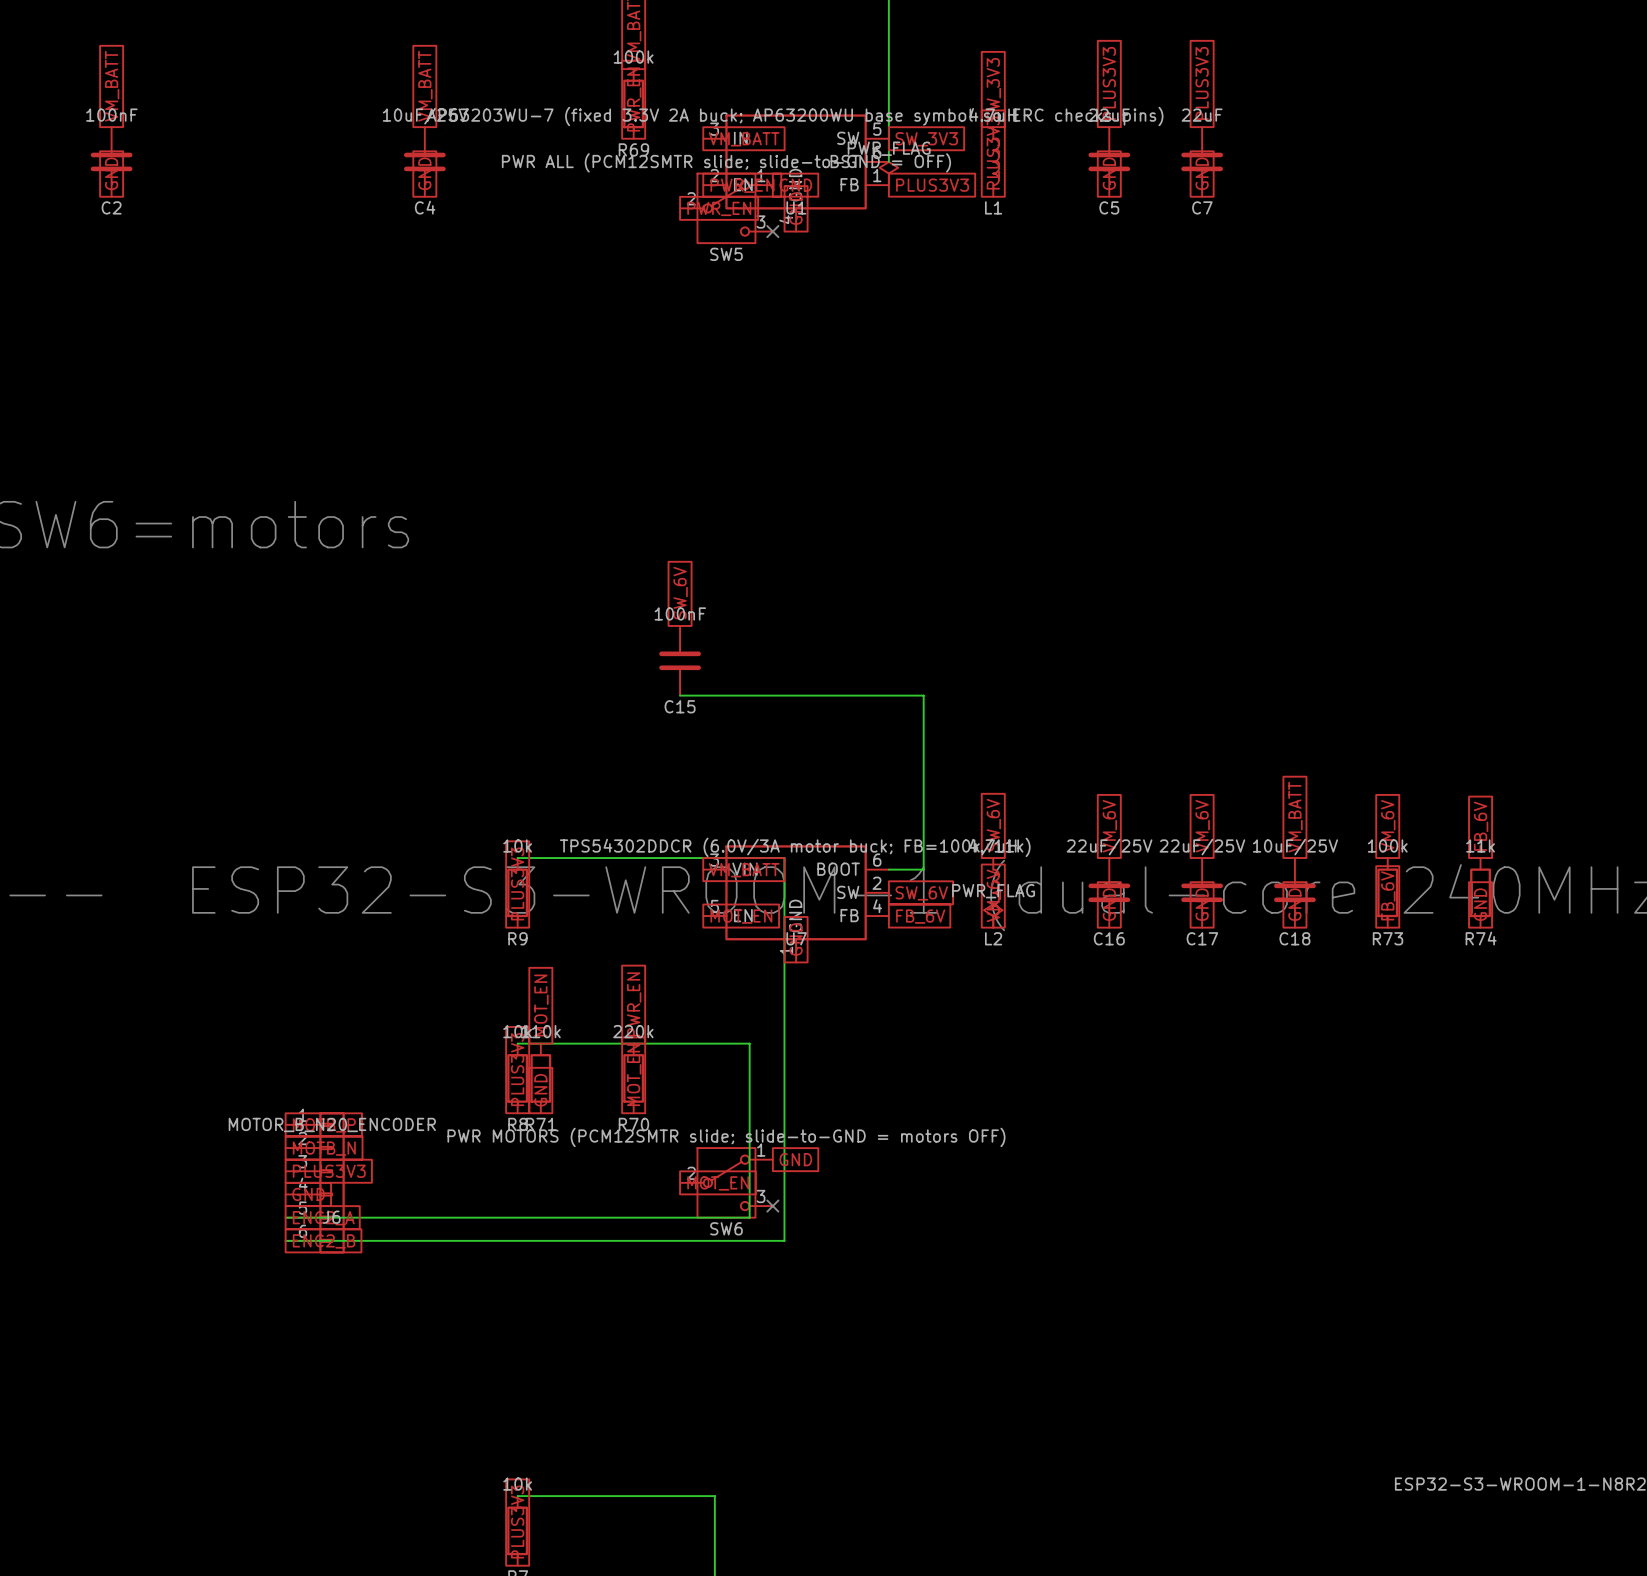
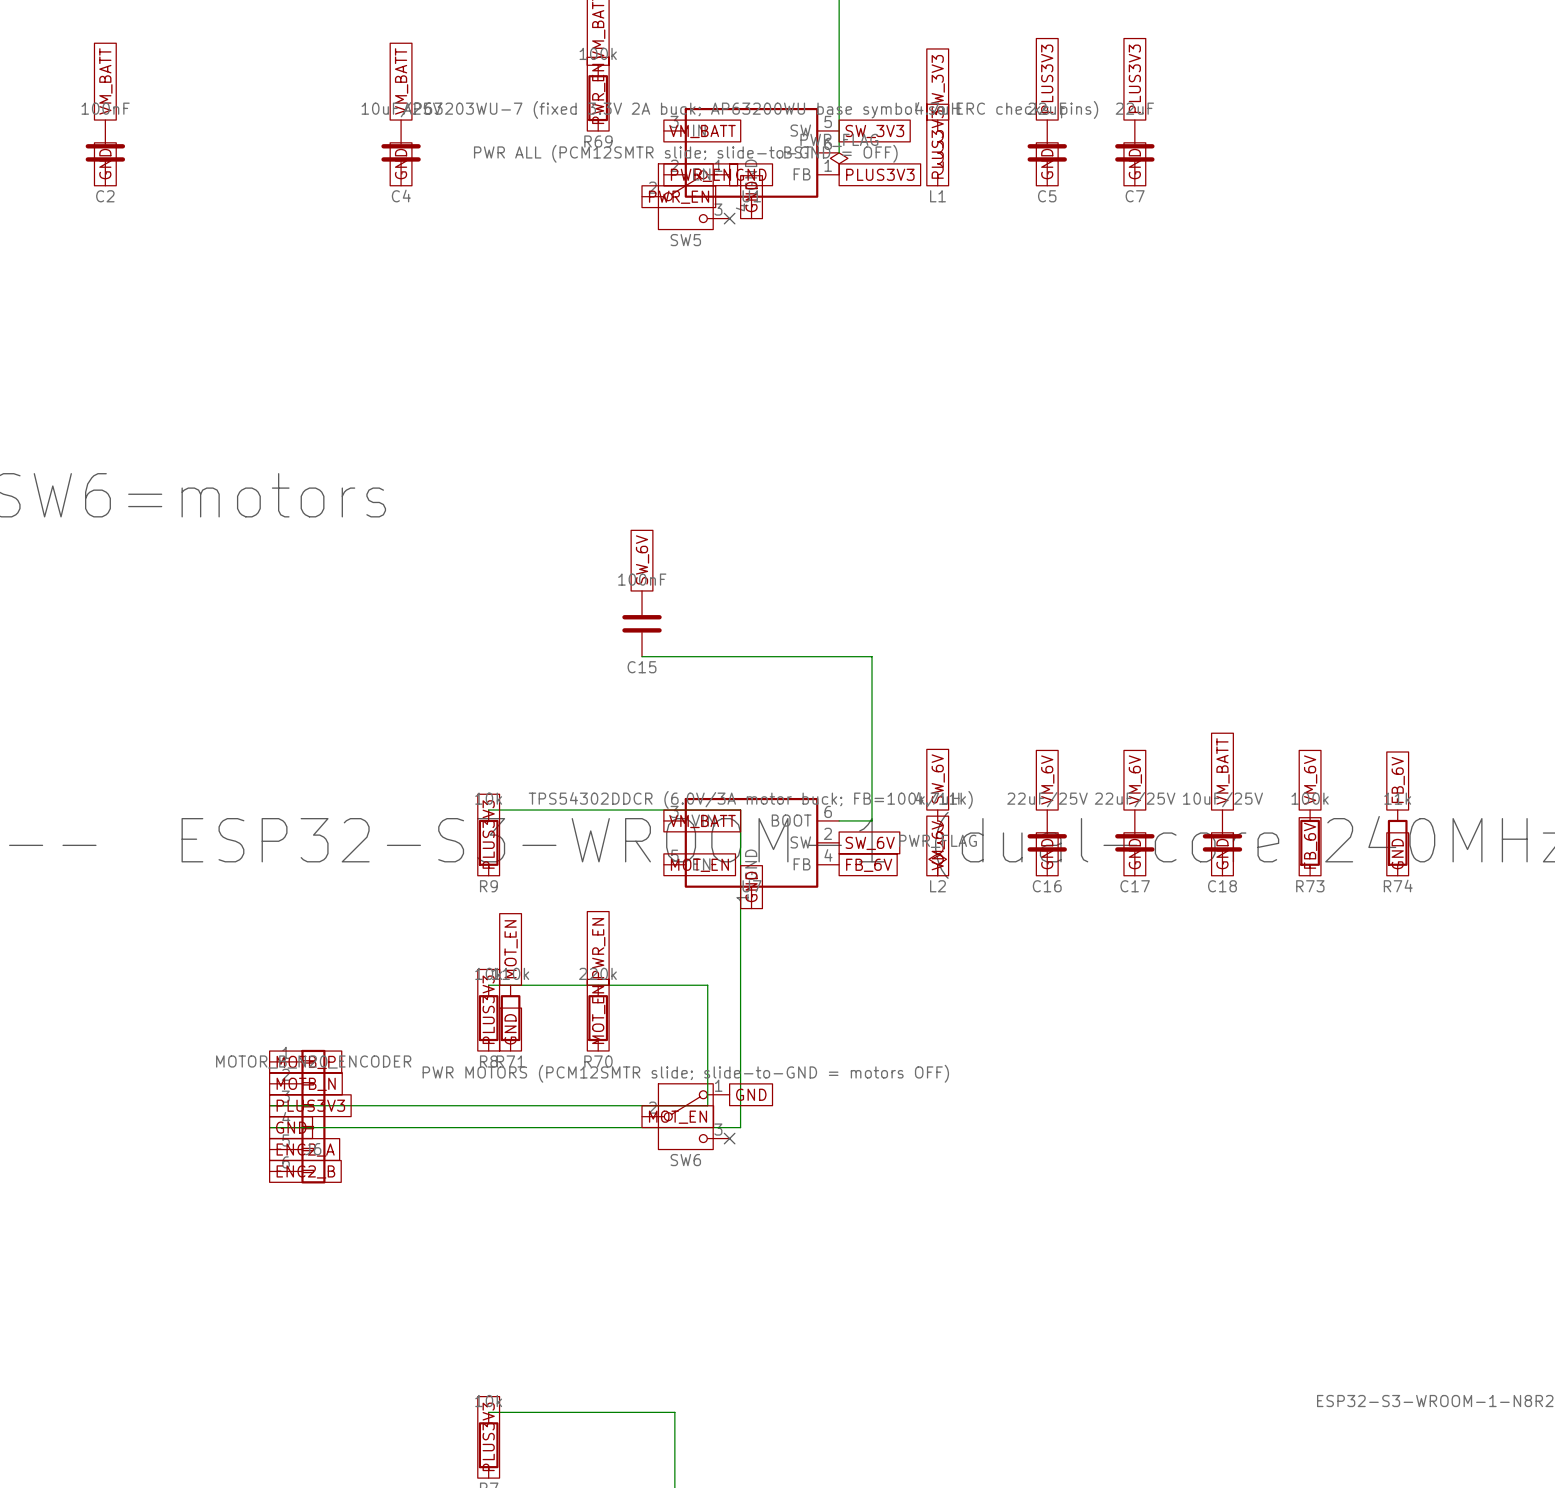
wire: (749, 1171) (749, 1217) (285, 1217) -> (707, 1105) (269, 1105)
wire: (784, 1194) (784, 1240) (285, 1240) -> (740, 1127) (269, 1127)

